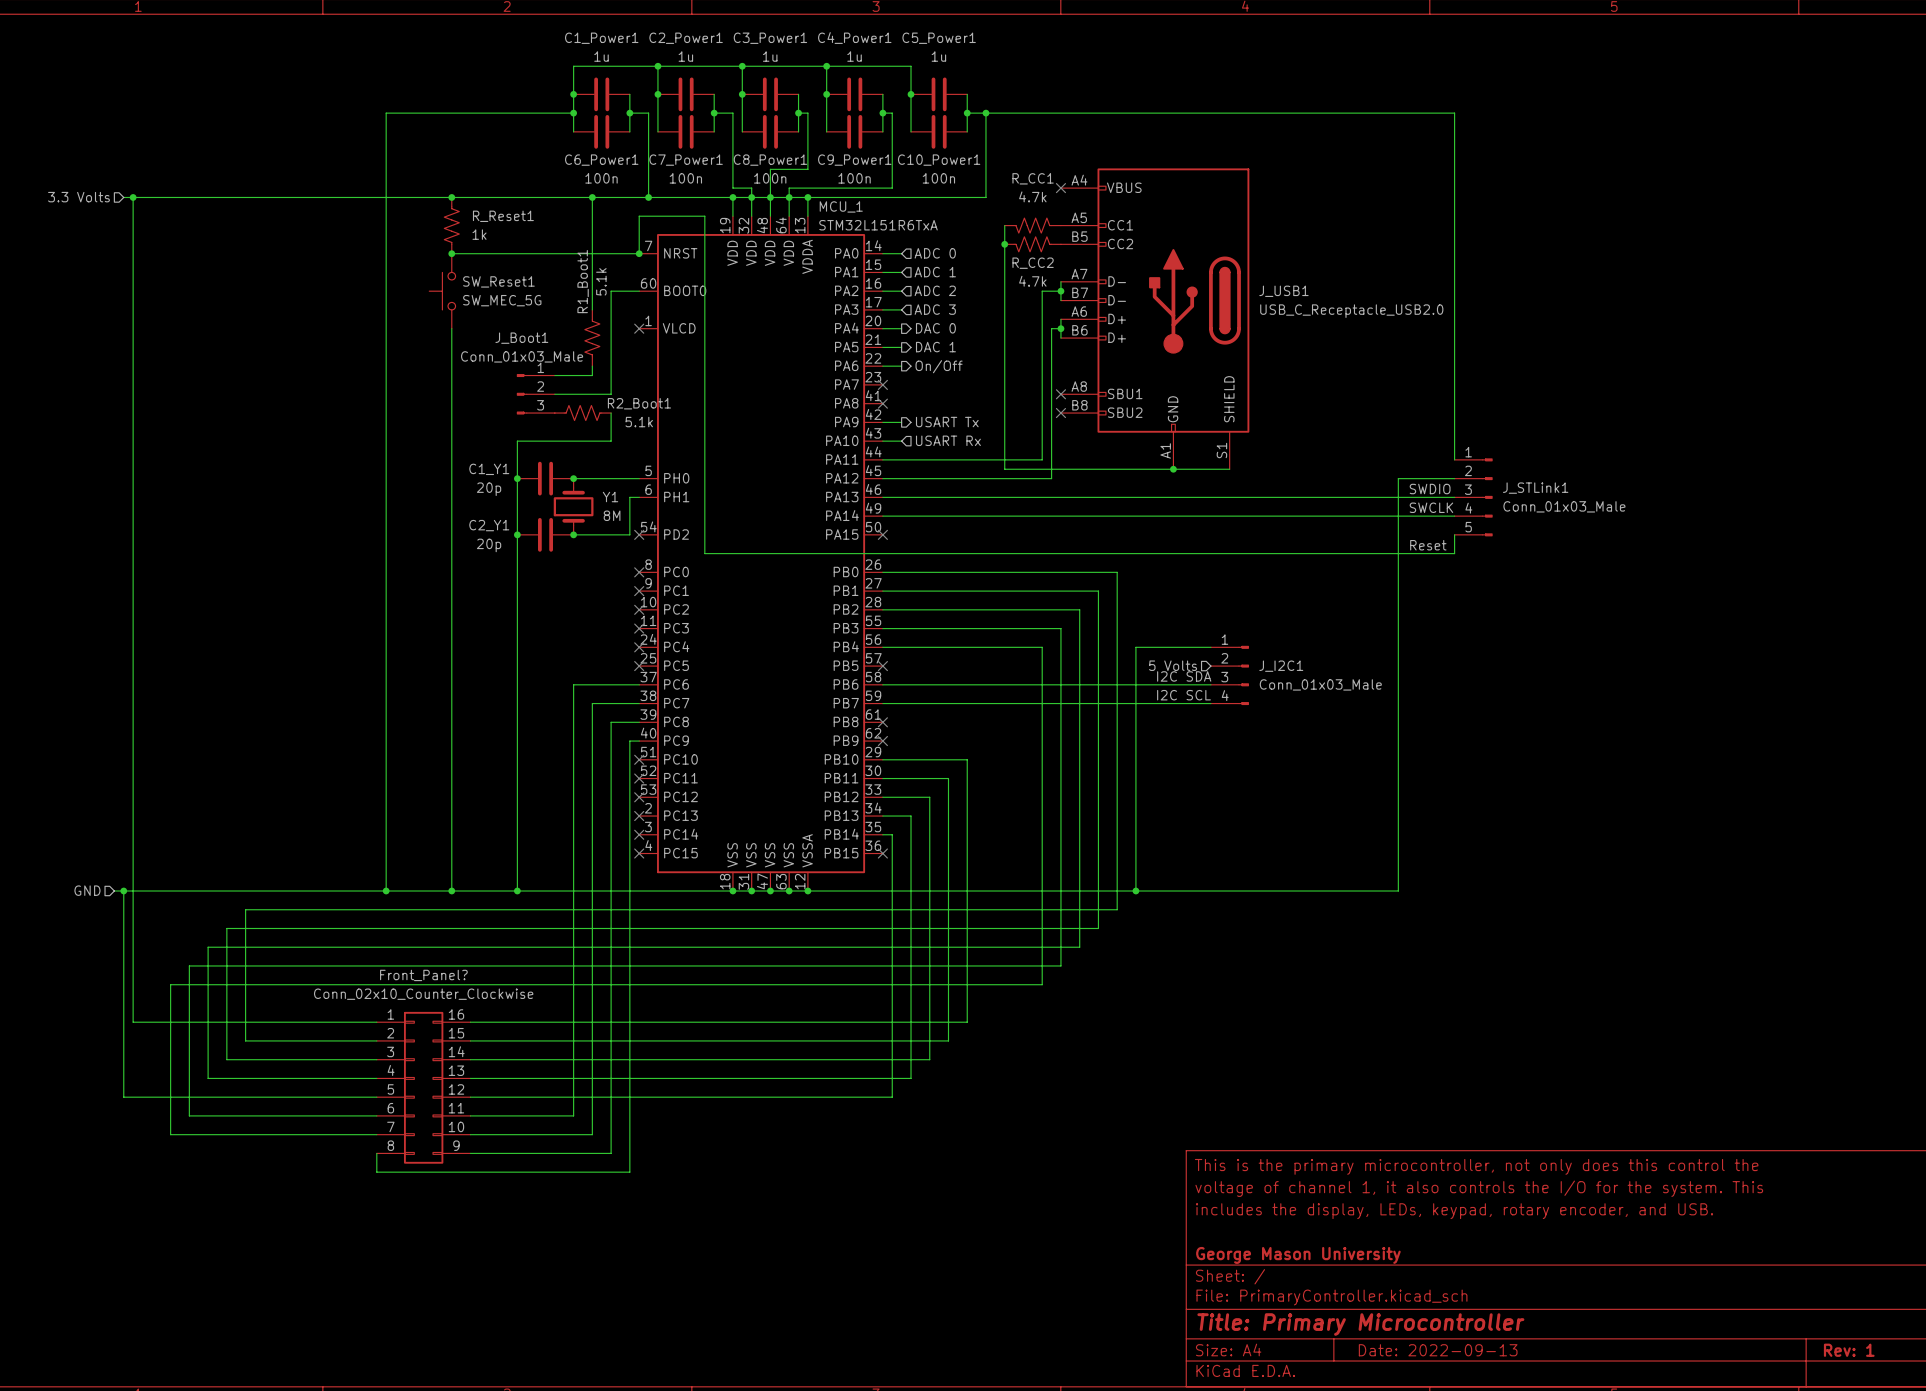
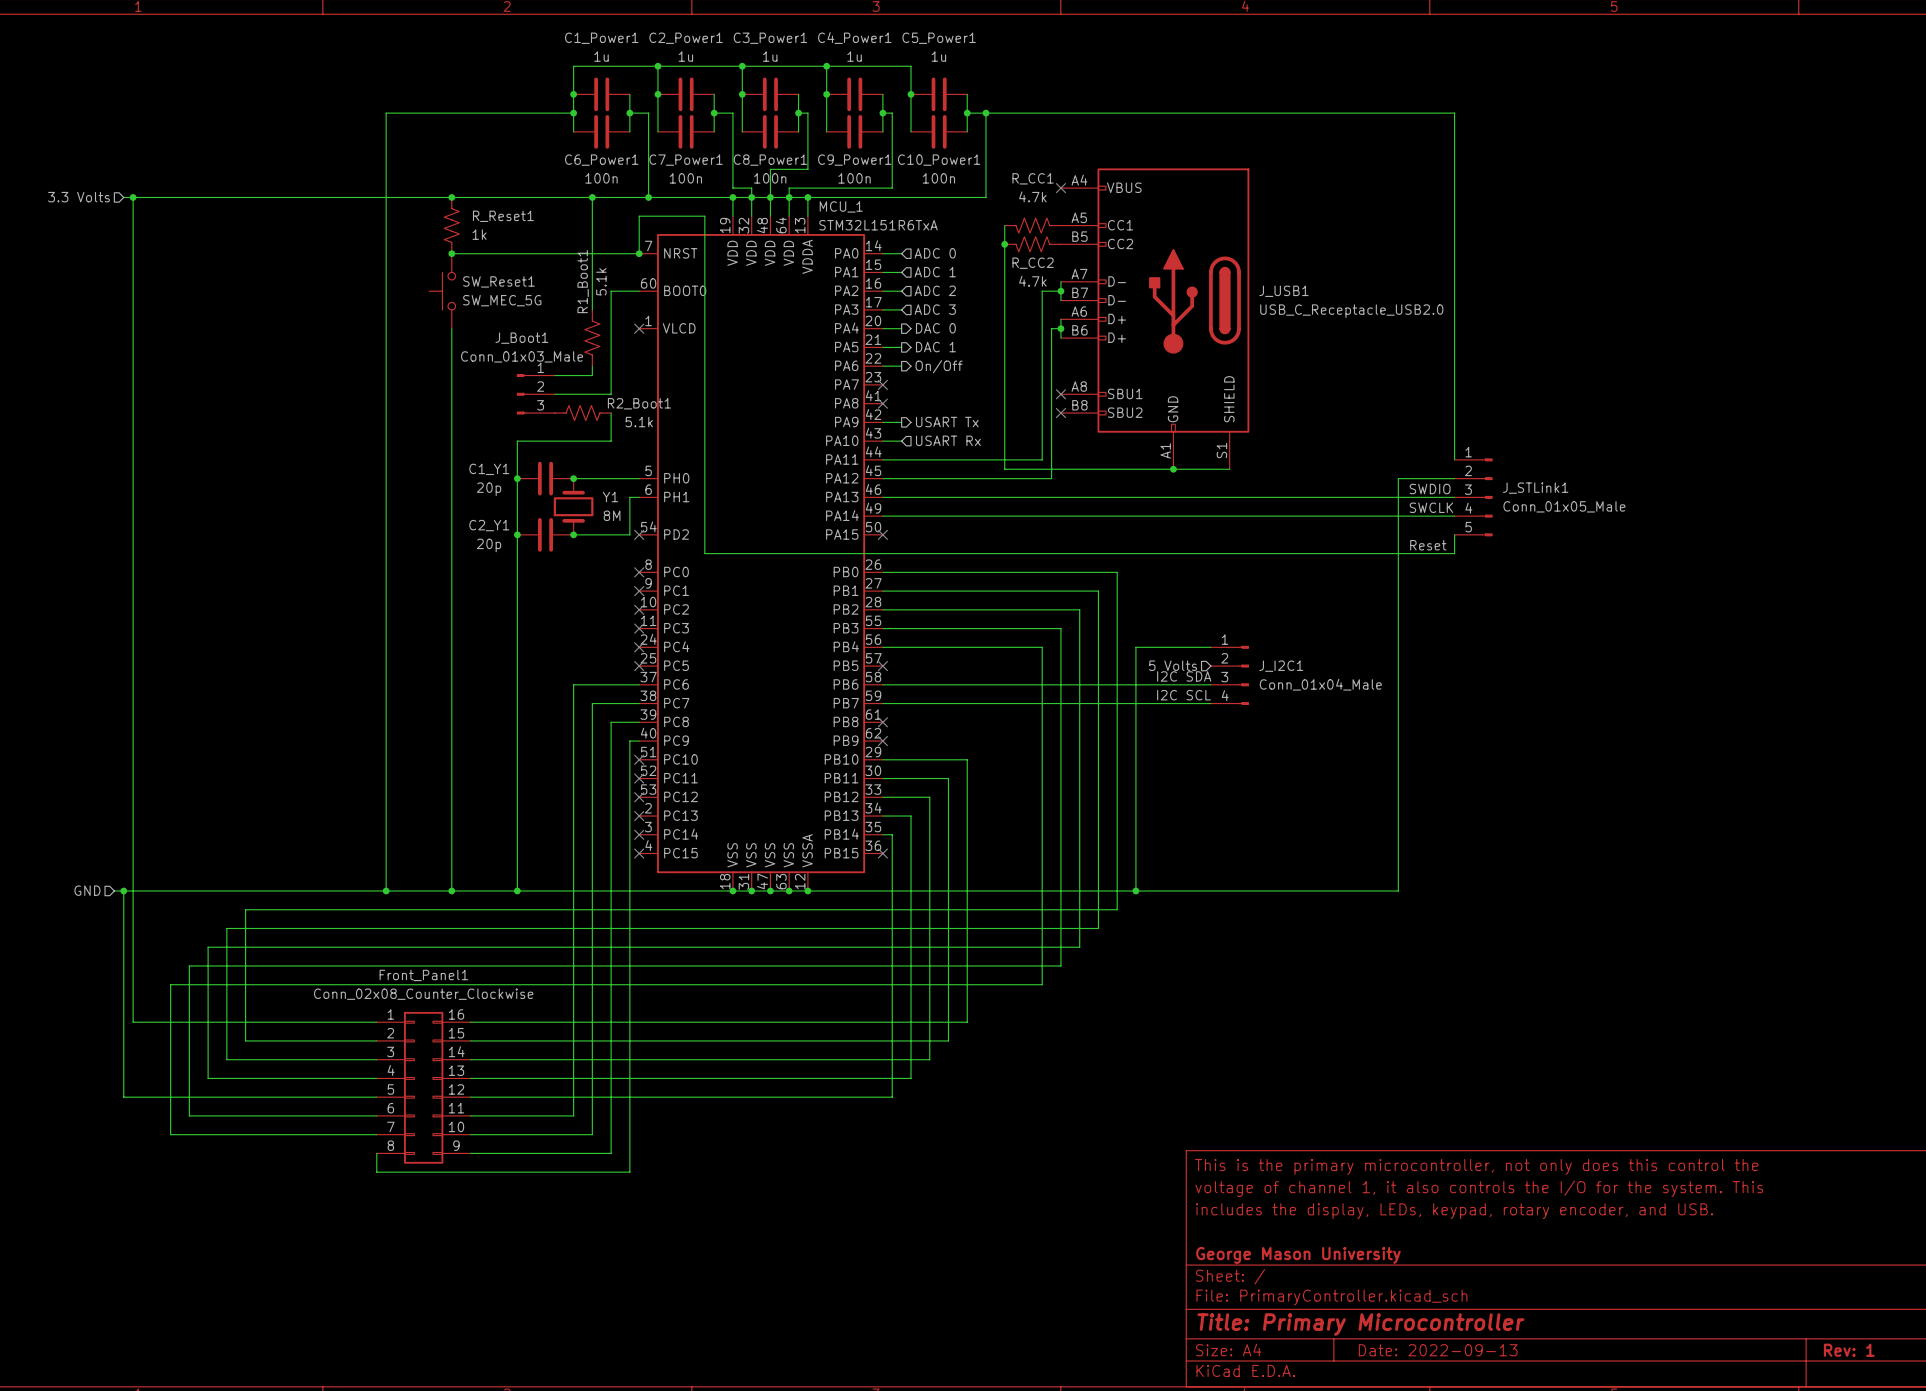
J_STLink1 value: Conn_01x03_Male (1564, 506) -> Conn_01x05_Male (1564, 506)
J_I2C1 value: Conn_01x03_Male (1320, 684) -> Conn_01x04_Male (1320, 684)
Front_Panel? name: Front_Panel? (423, 975) -> Front_Panel1 (423, 975)
Front_Panel? value: Conn_02x10_Counter_Clockwise (423, 994) -> Conn_02x08_Counter_Clockwise (423, 994)

